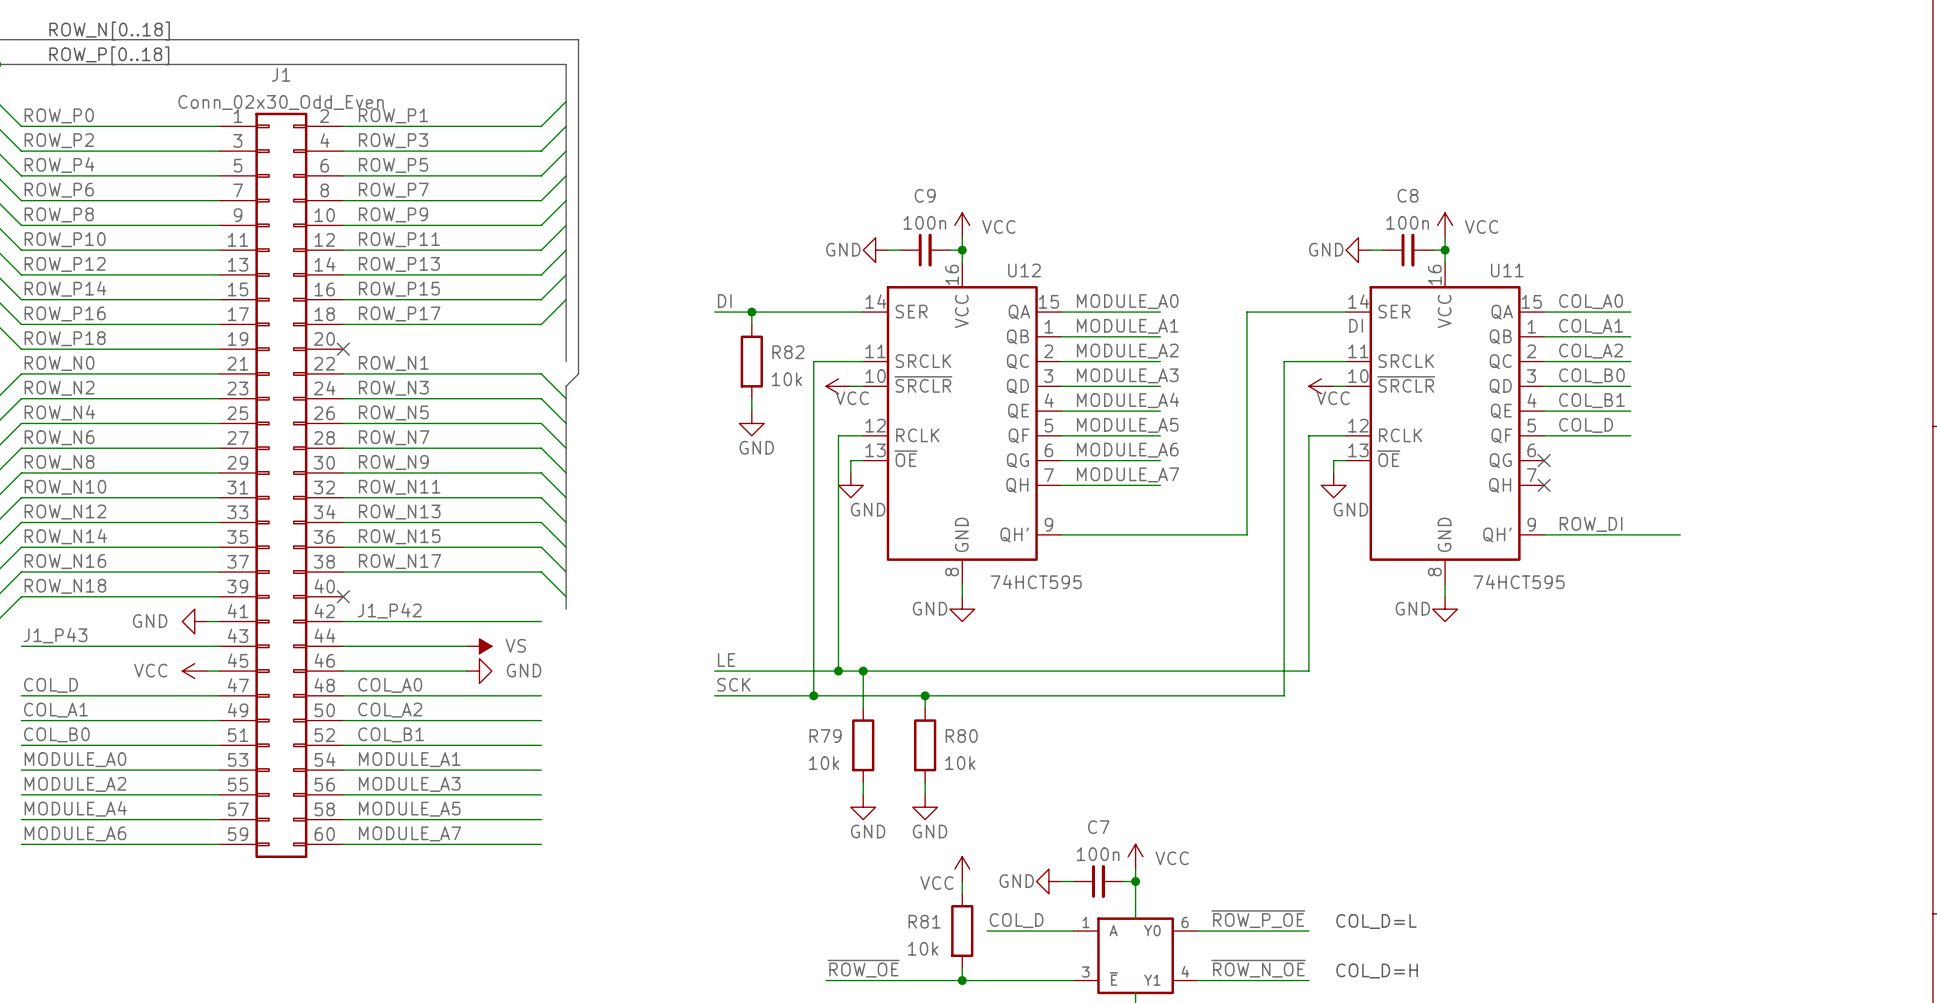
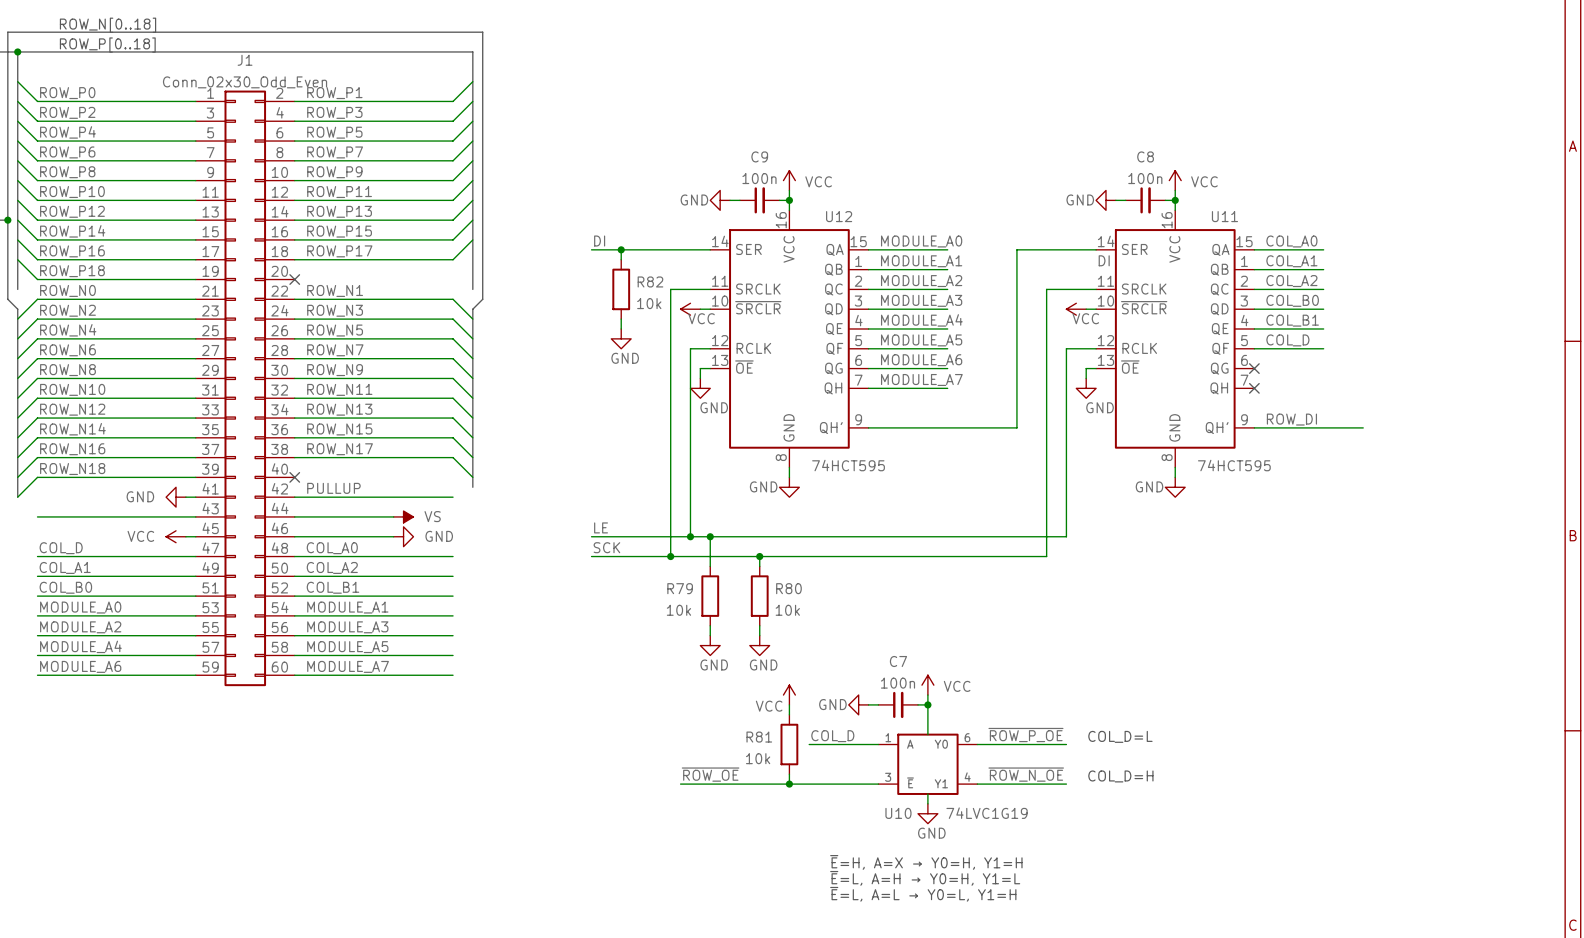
label: J1_P42 (389, 610) -> PULLUP (333, 488)
label: J1_P43 (55, 635) -> none

